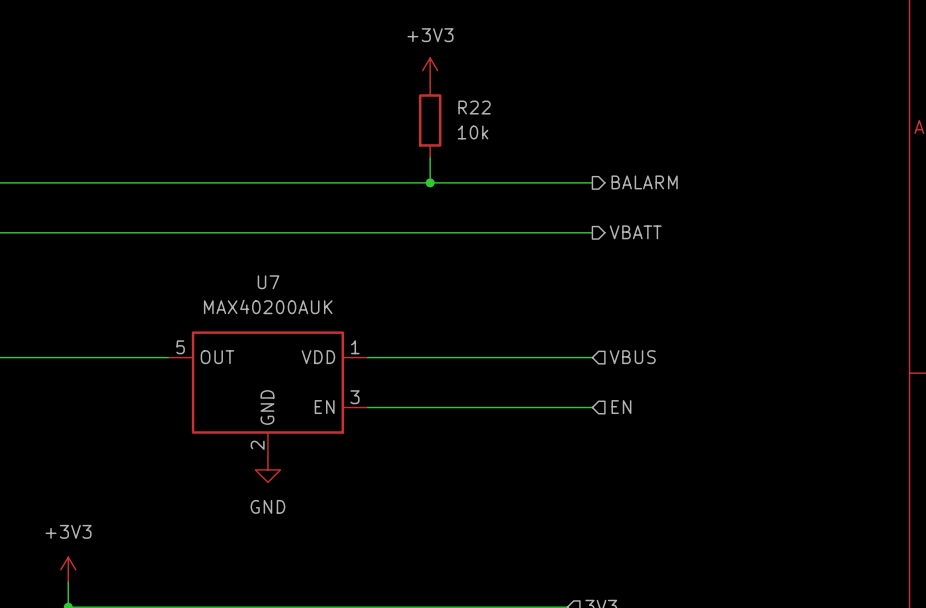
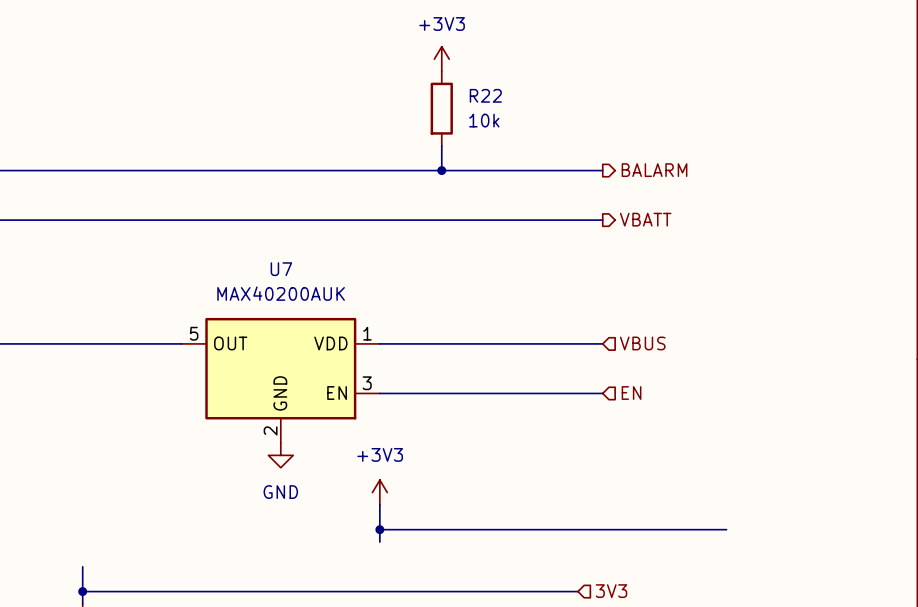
power symbol: none -> +3V3 (379, 492)
wire: none -> (379, 504) (379, 542)
wire: none -> (379, 529) (726, 529)
junction: none -> (379, 529)
power symbol: +3V3 (68, 569) -> none

